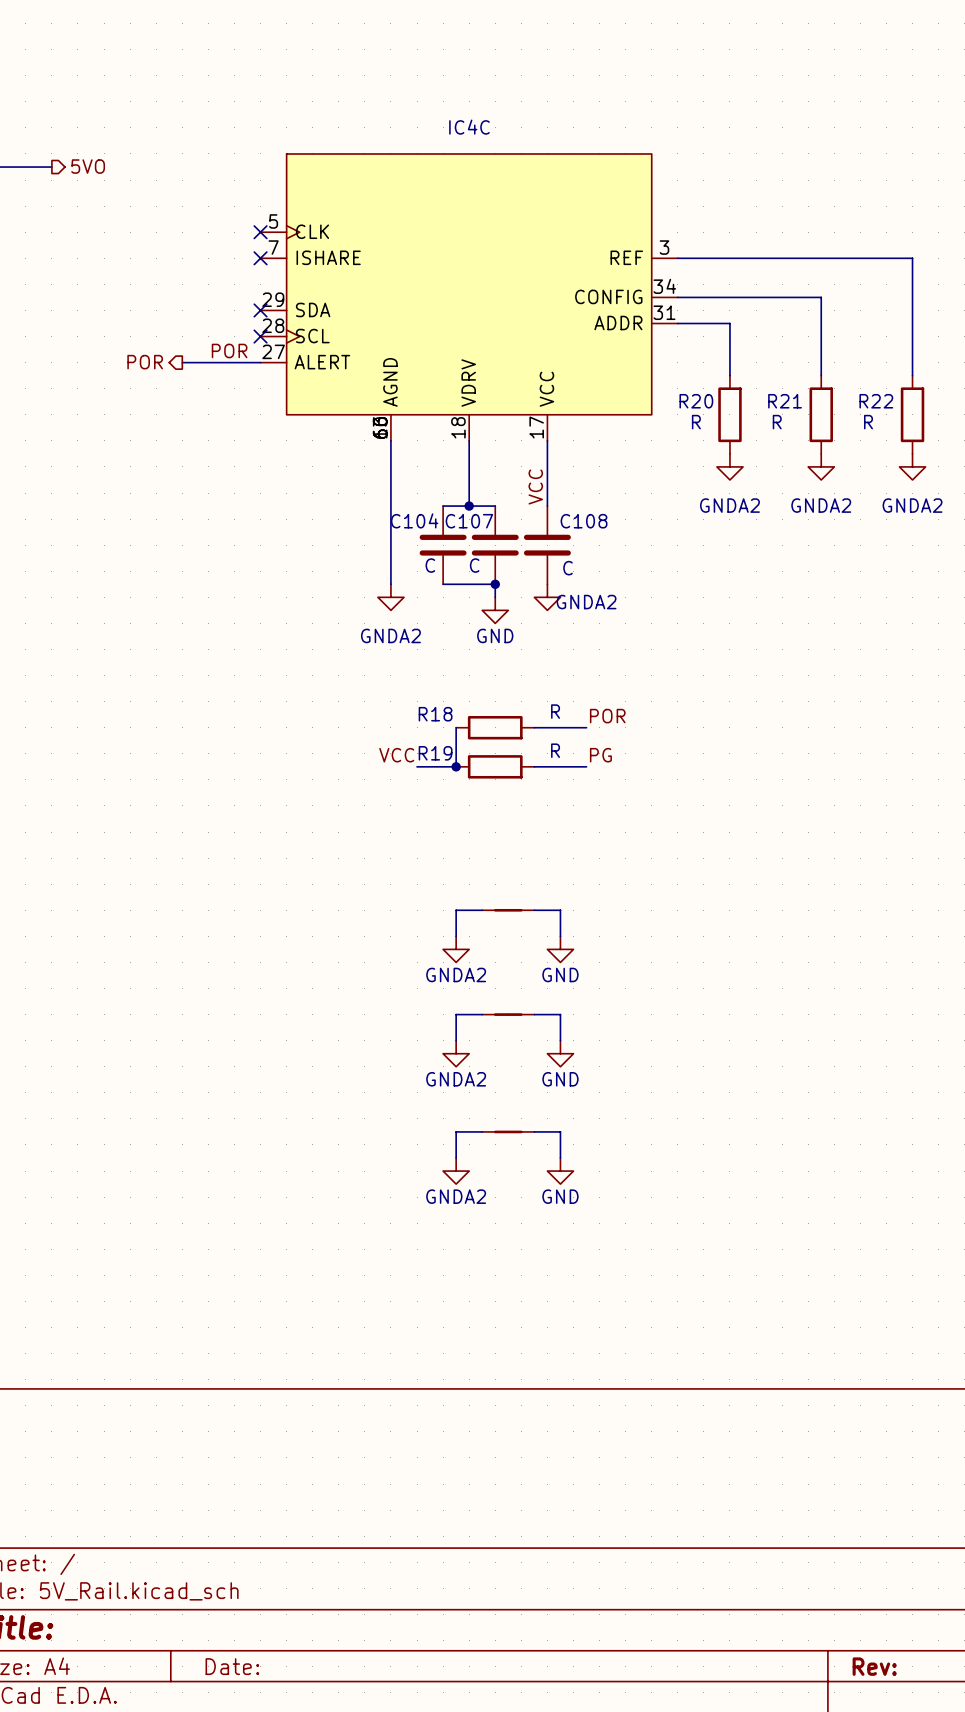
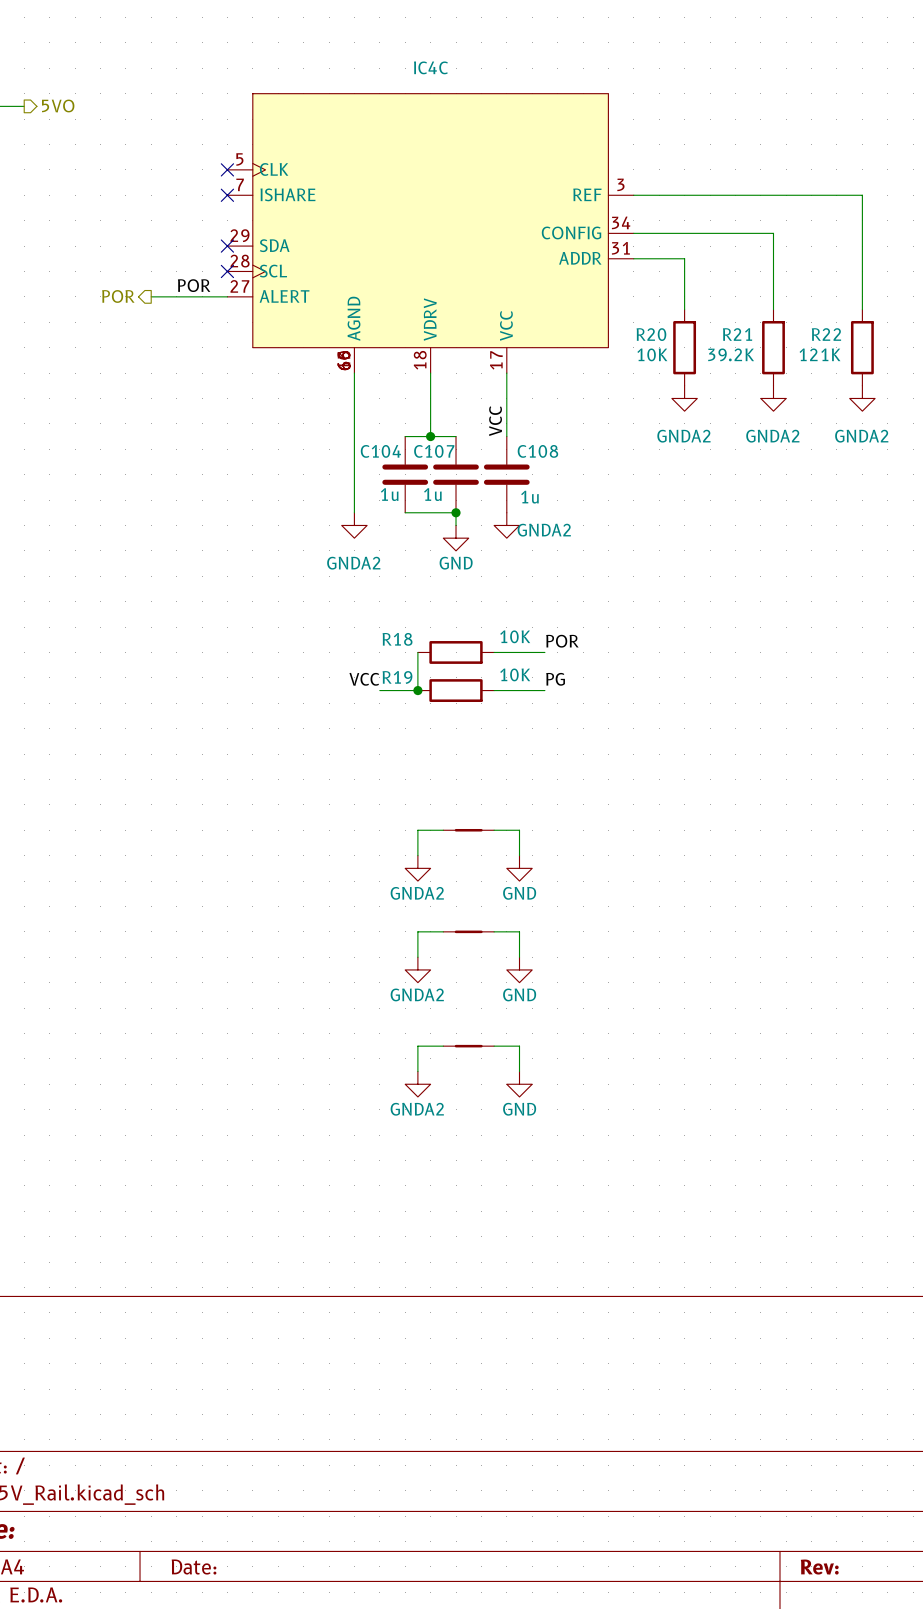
R20 value: R (696, 422) -> 10K (652, 354)
R21 value: R (777, 422) -> 39.2K (731, 354)
R22 value: R (868, 422) -> 121K (819, 354)
C104 value: C (430, 565) -> 1u (389, 494)
C107 value: C (474, 565) -> 1u (432, 494)
C108 value: C (568, 568) -> 1u (529, 497)
R18 value: R (555, 711) -> 10K (515, 636)
R19 value: R (555, 750) -> 10K (515, 674)

